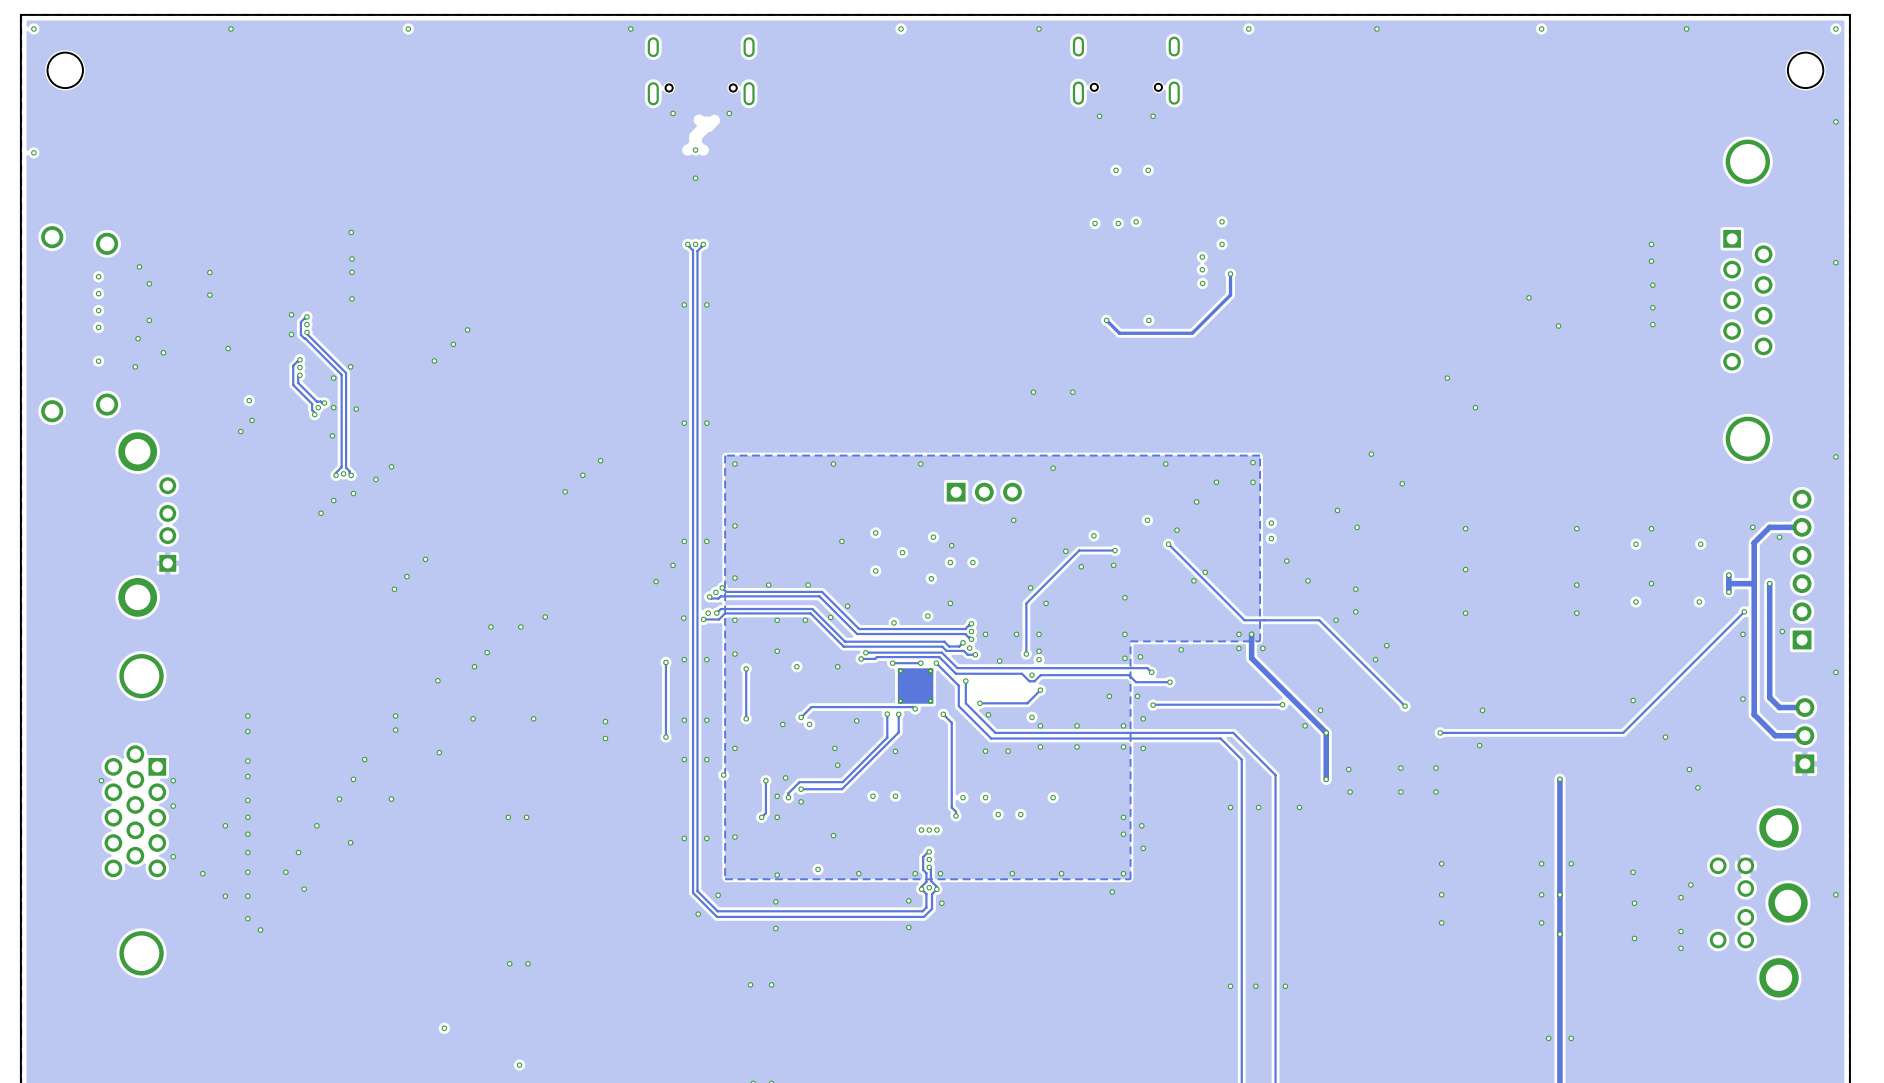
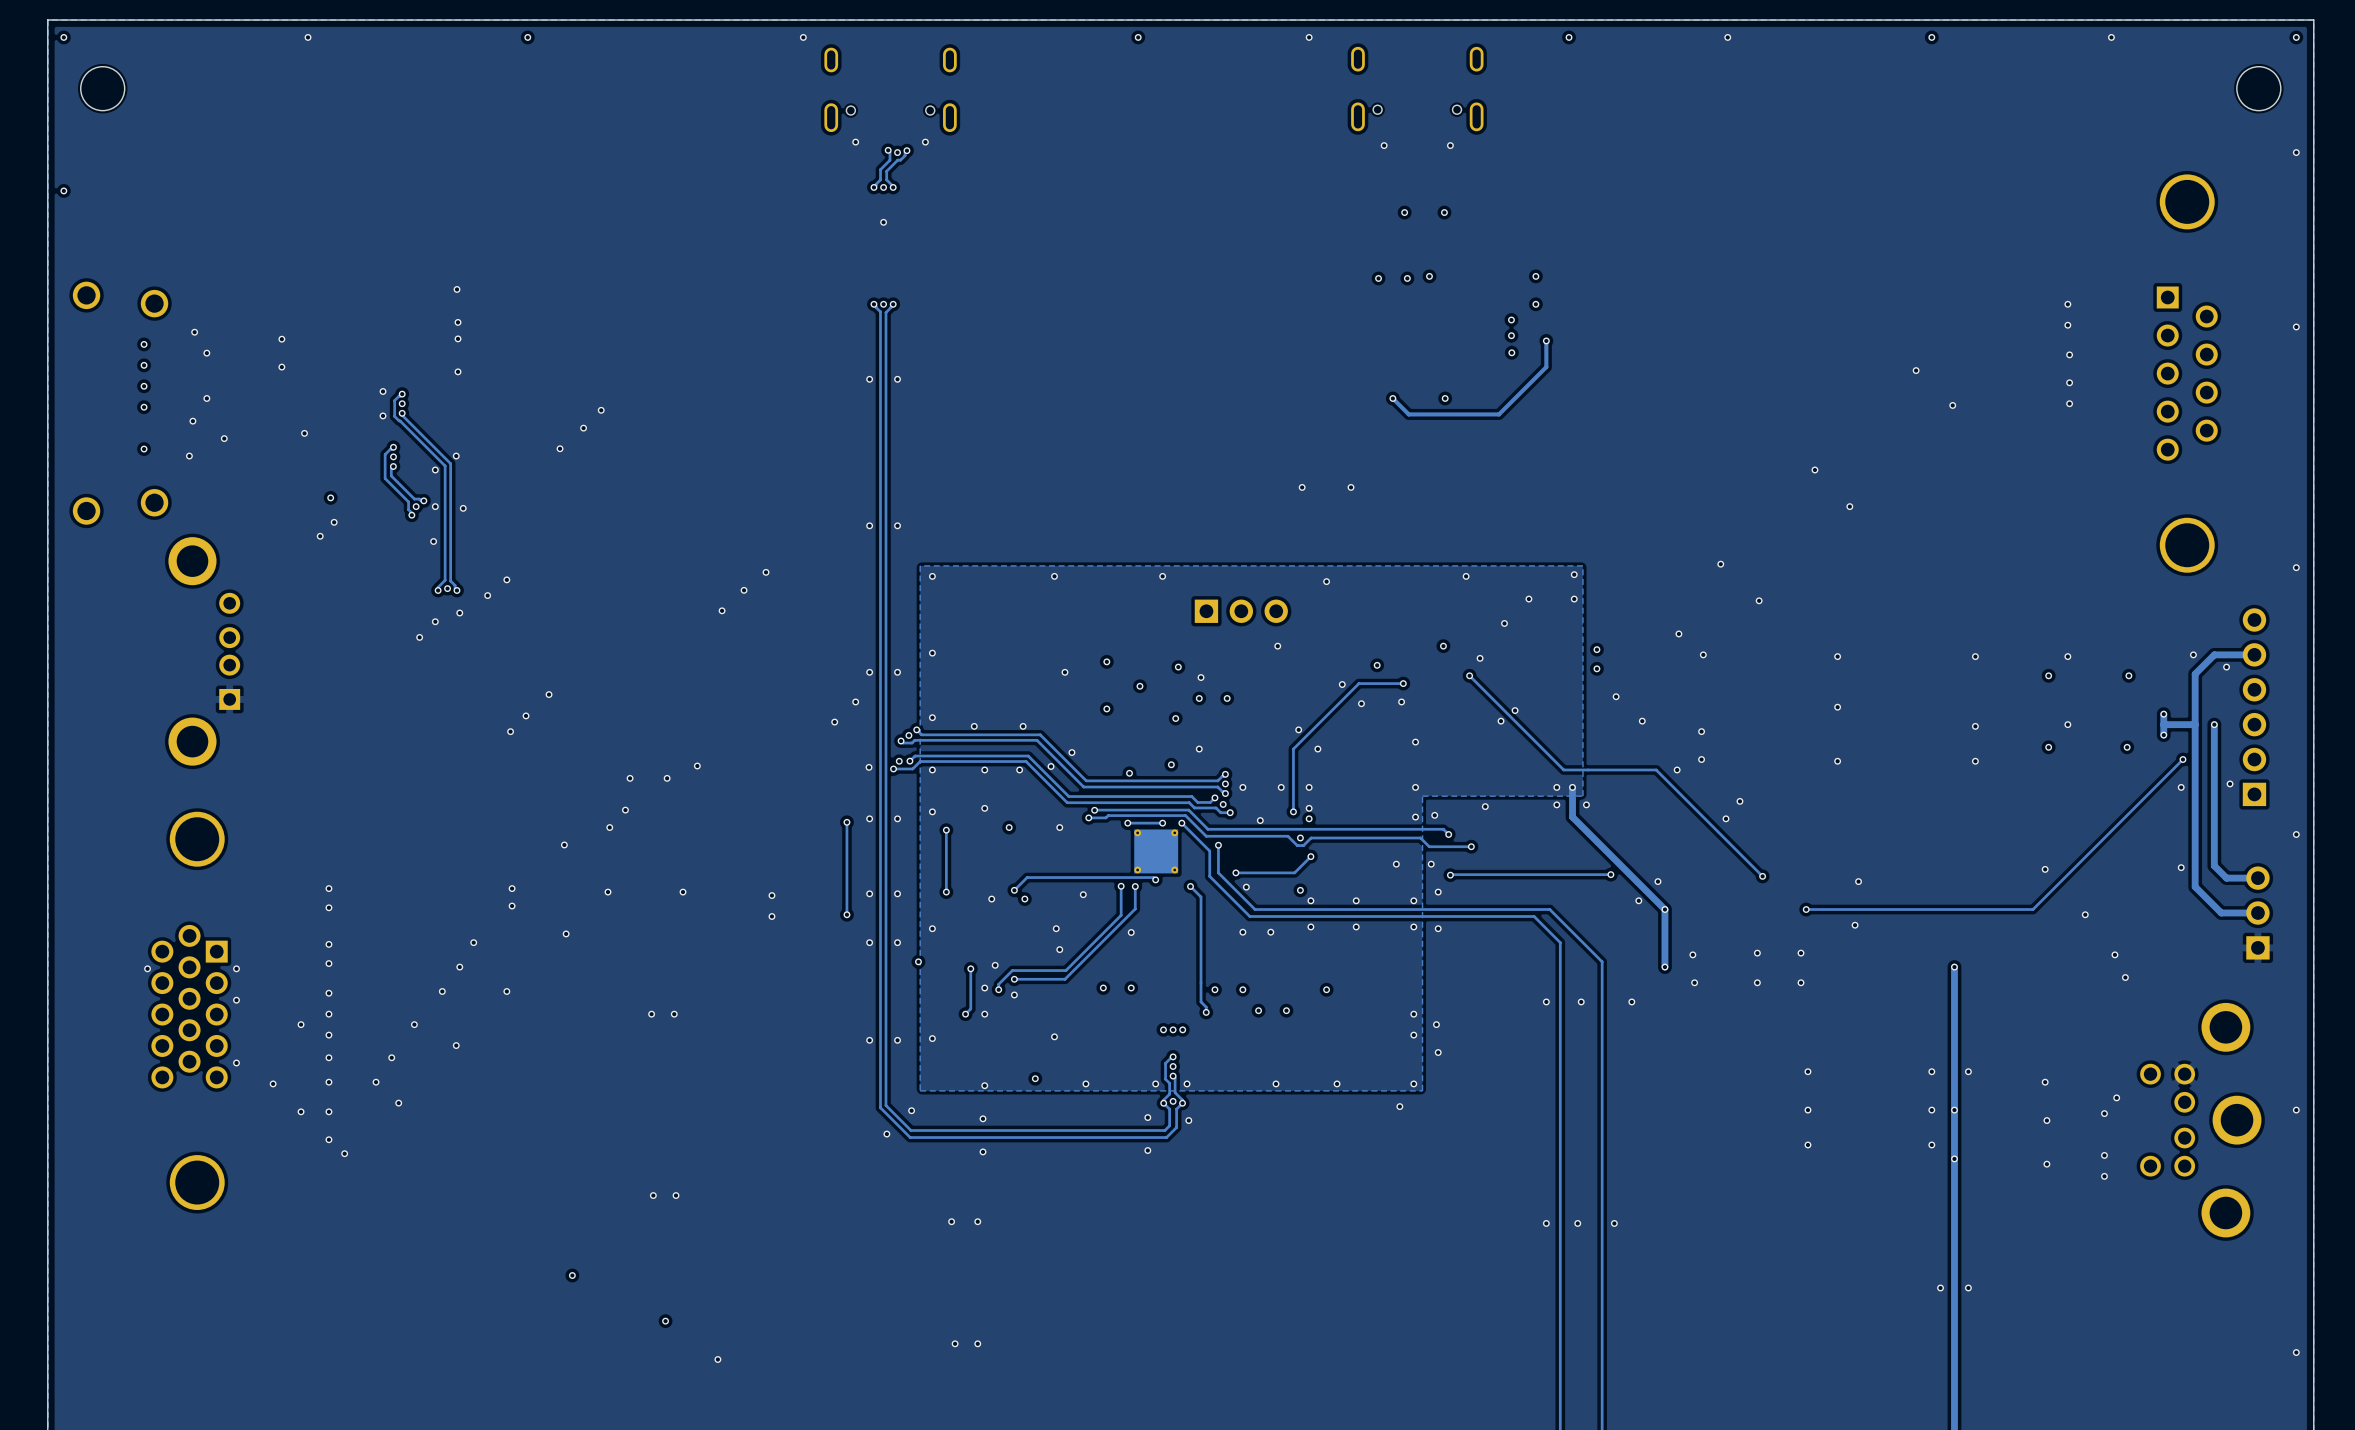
track: none -> (888, 150) (889, 160) (880, 169) (880, 179) (873, 187)
via: none -> (888, 150)
track: none -> (906, 150) (905, 155) (886, 171) (886, 179) (893, 187)
via: none -> (906, 150)
via: none -> (897, 152)
via: none -> (873, 187)
via: none -> (893, 187)

